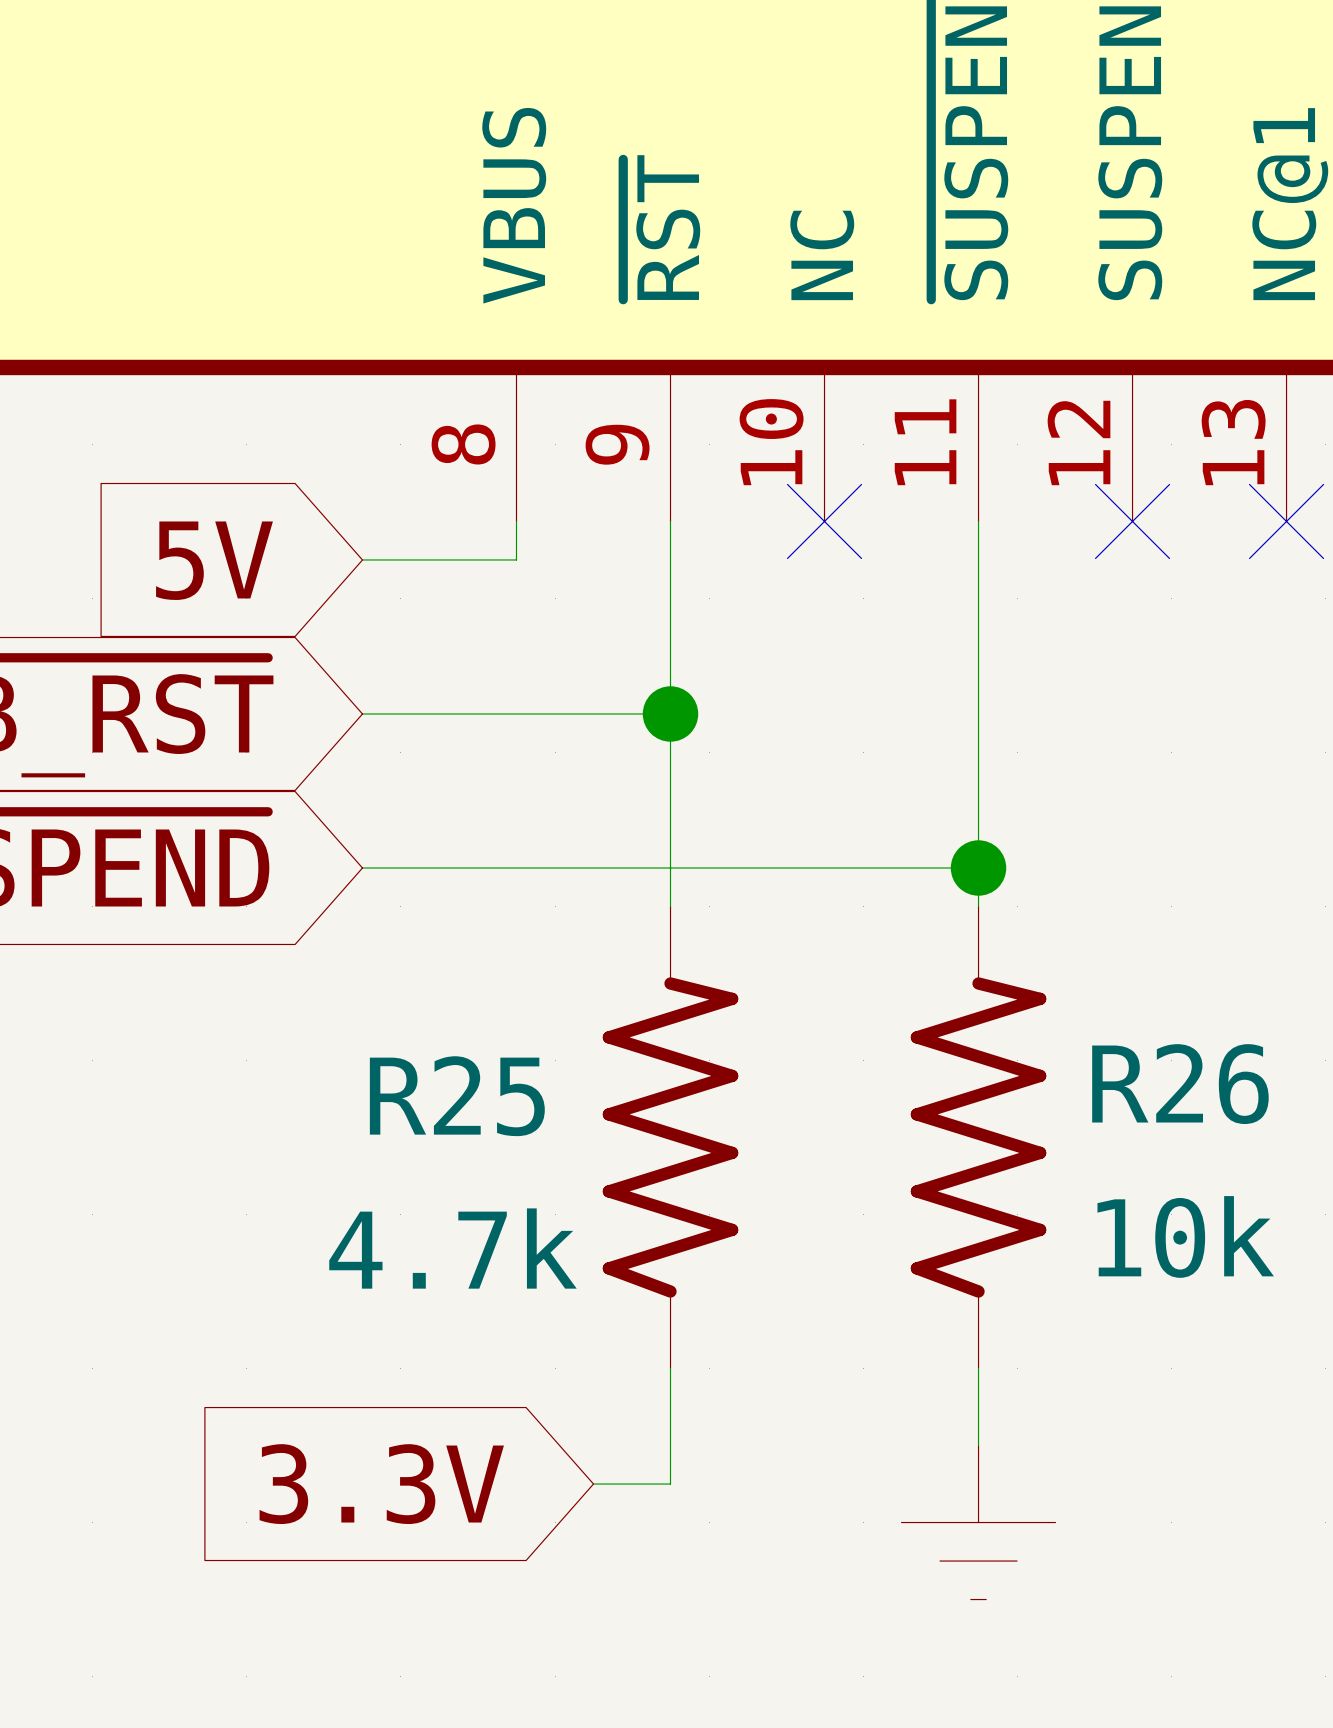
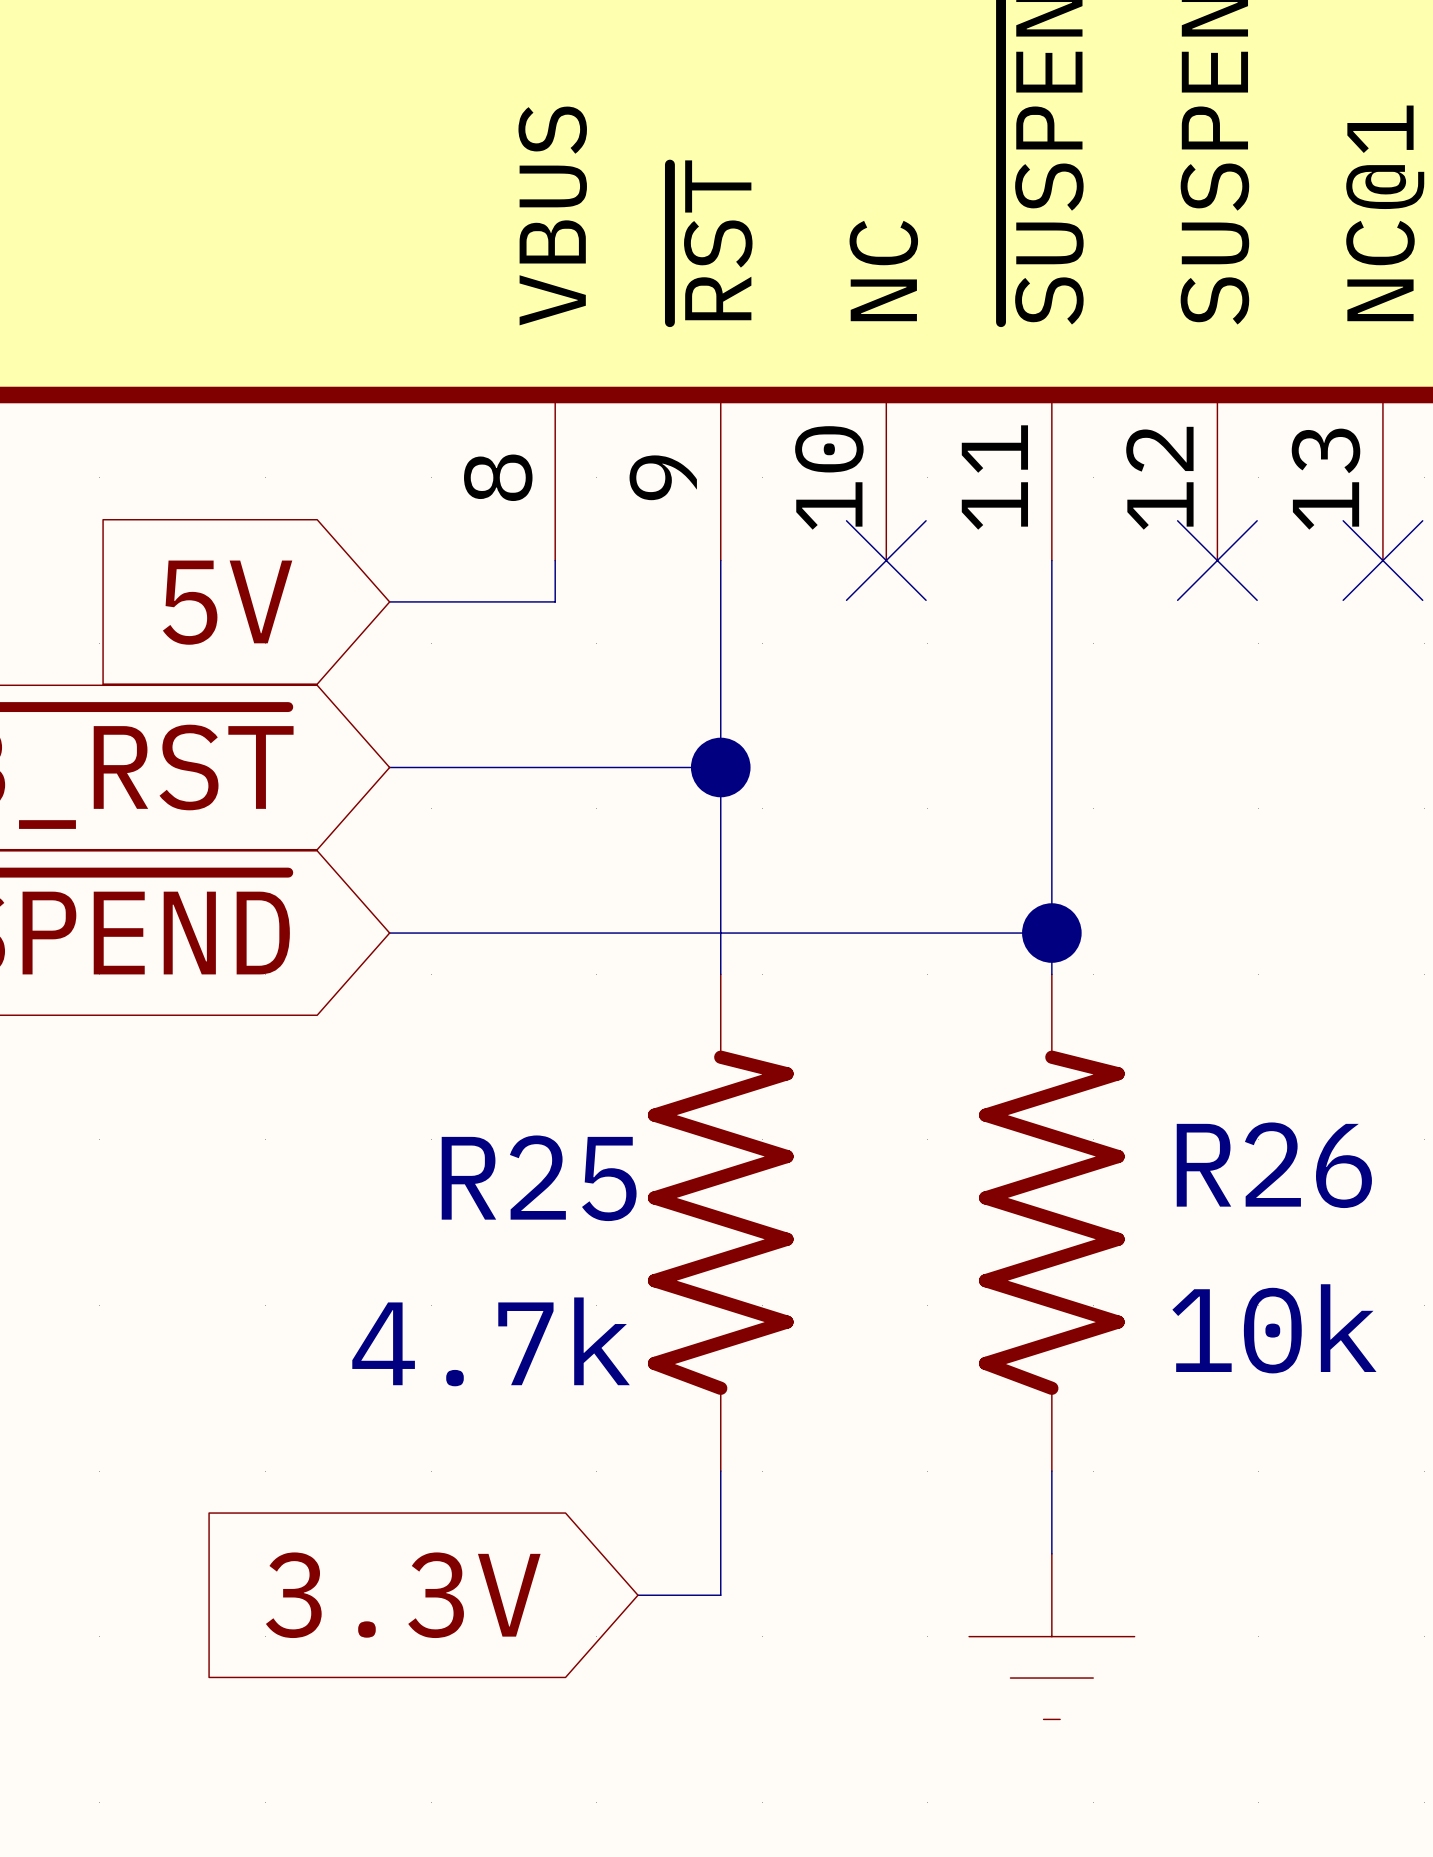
R25 name position: R25 (457, 1096) -> R25 (539, 1178)

